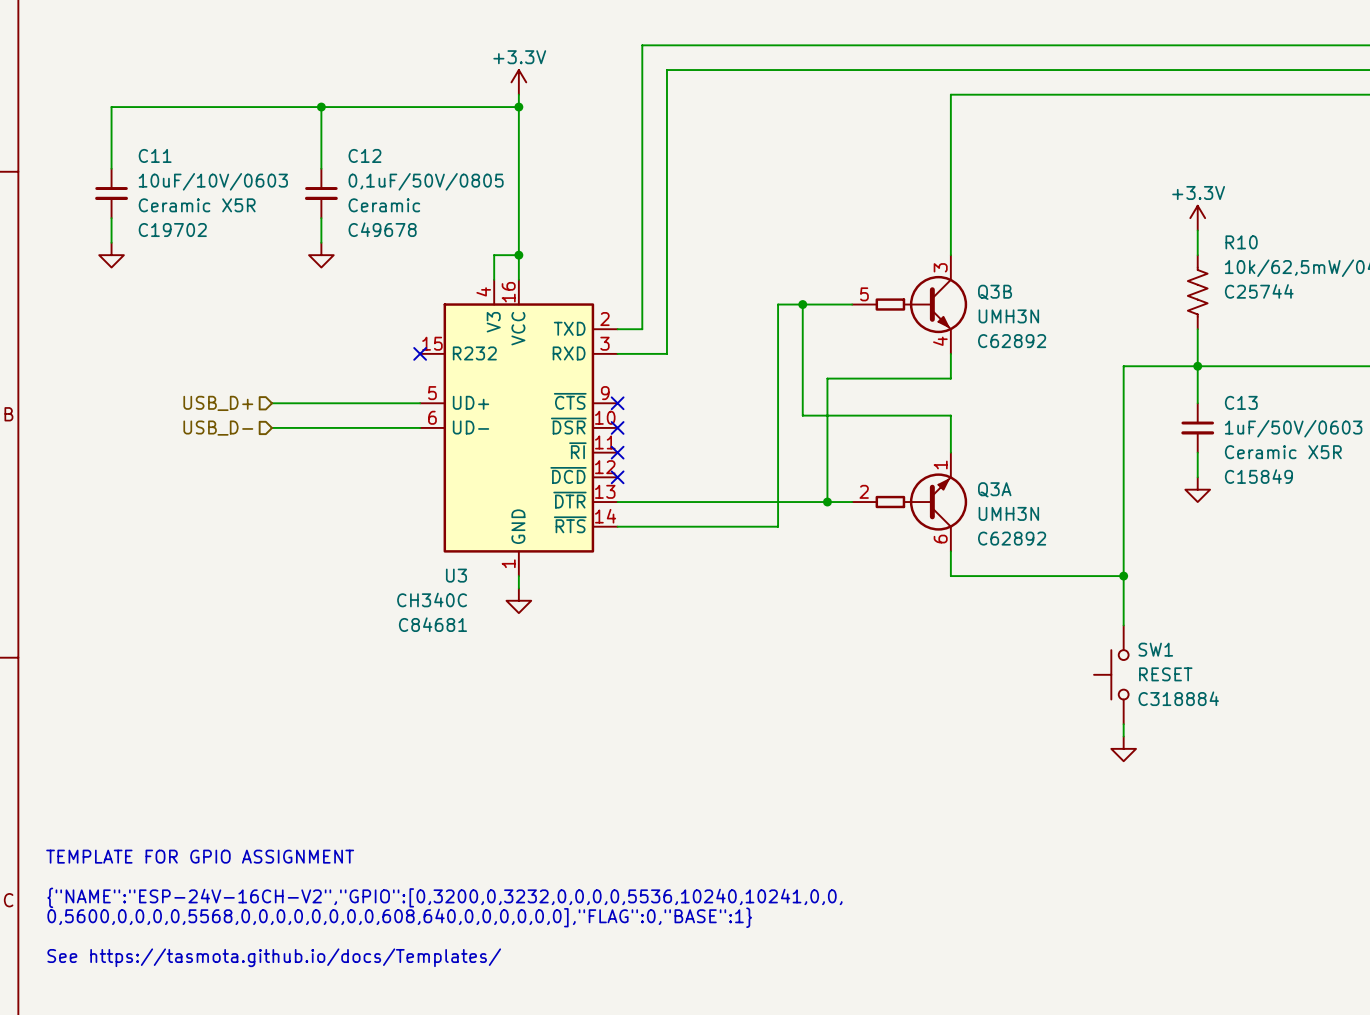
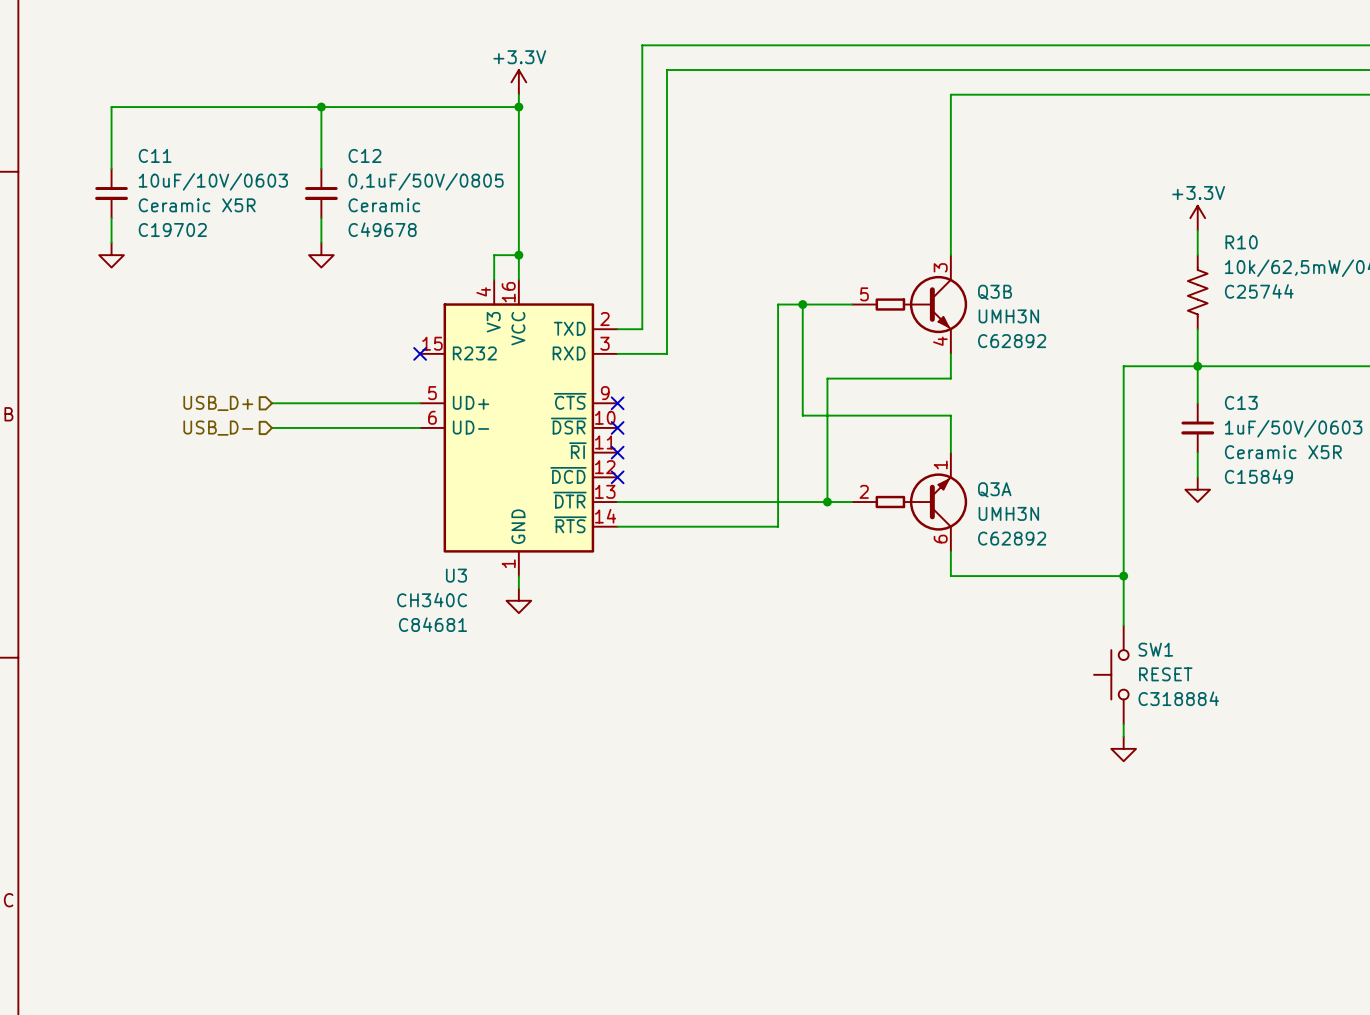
text: TEMPLATE FOR GPIO ASSIGNMENT (200, 856) -> none
text: {"NAME":"ESP-24V-16CH-V2","GPIO":[0,3200,0,3232,0,0,0,0,5536,10240,10241,0,0, (444, 897) -> none
text: 0,5600,0,0,0,0,5568,0,0,0,0,0,0,0,0,608,640,0,0,0,0,0,0],"FLAG":0,"BASE":1} (399, 917) -> none
text: See https://tasmota.github.io/docs/Templates/ (274, 957) -> none

